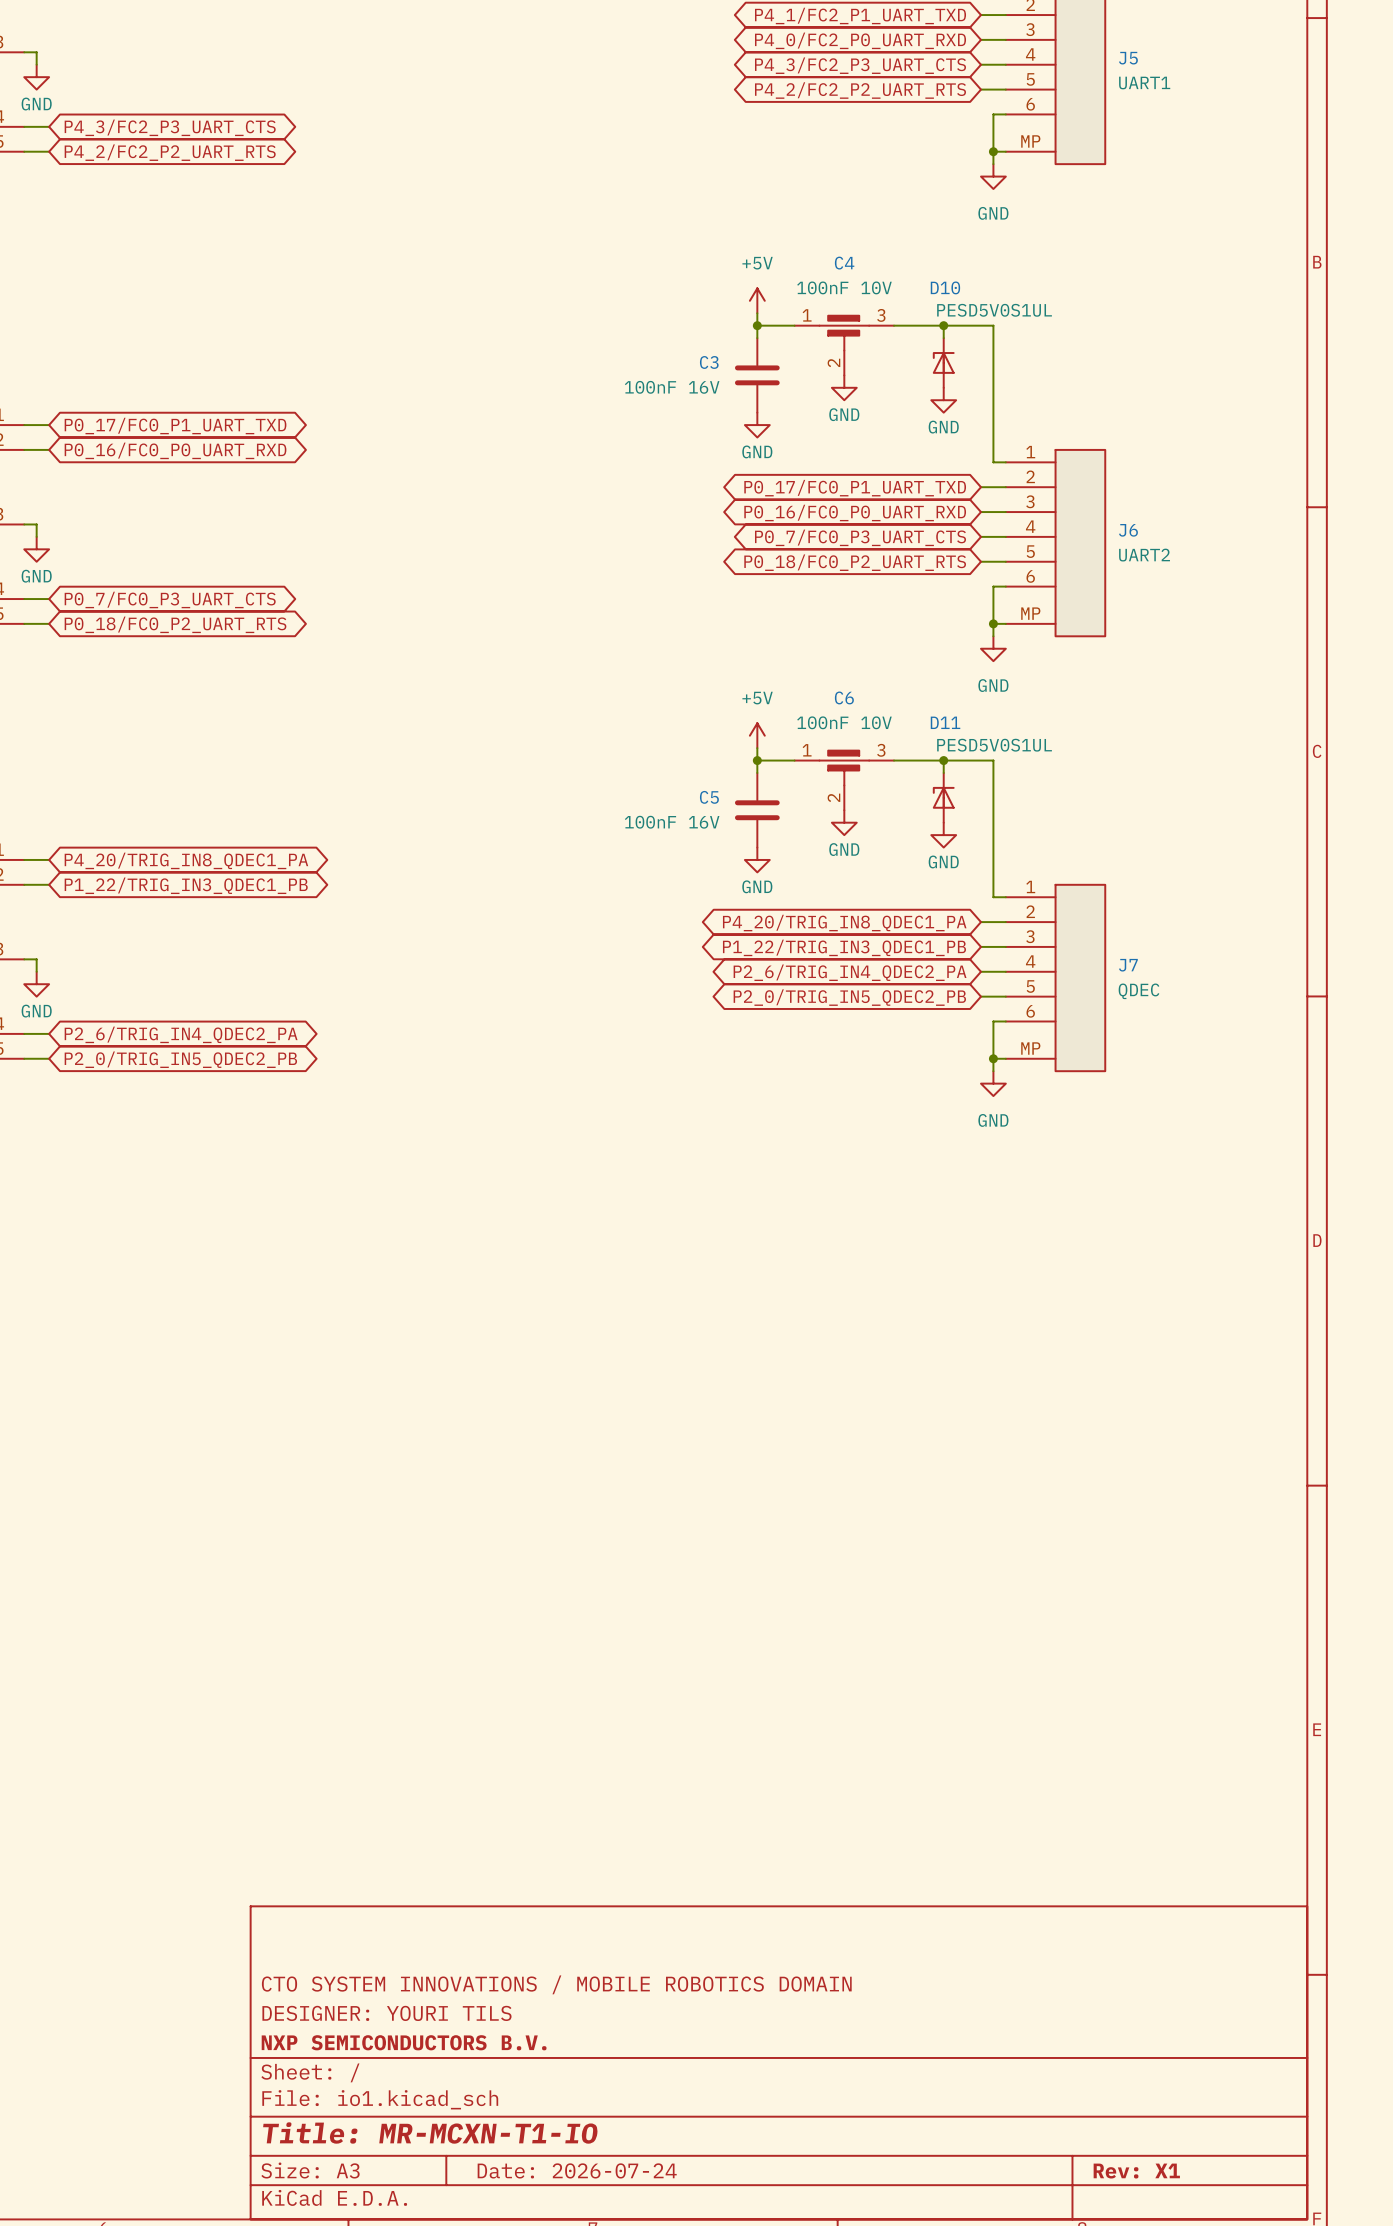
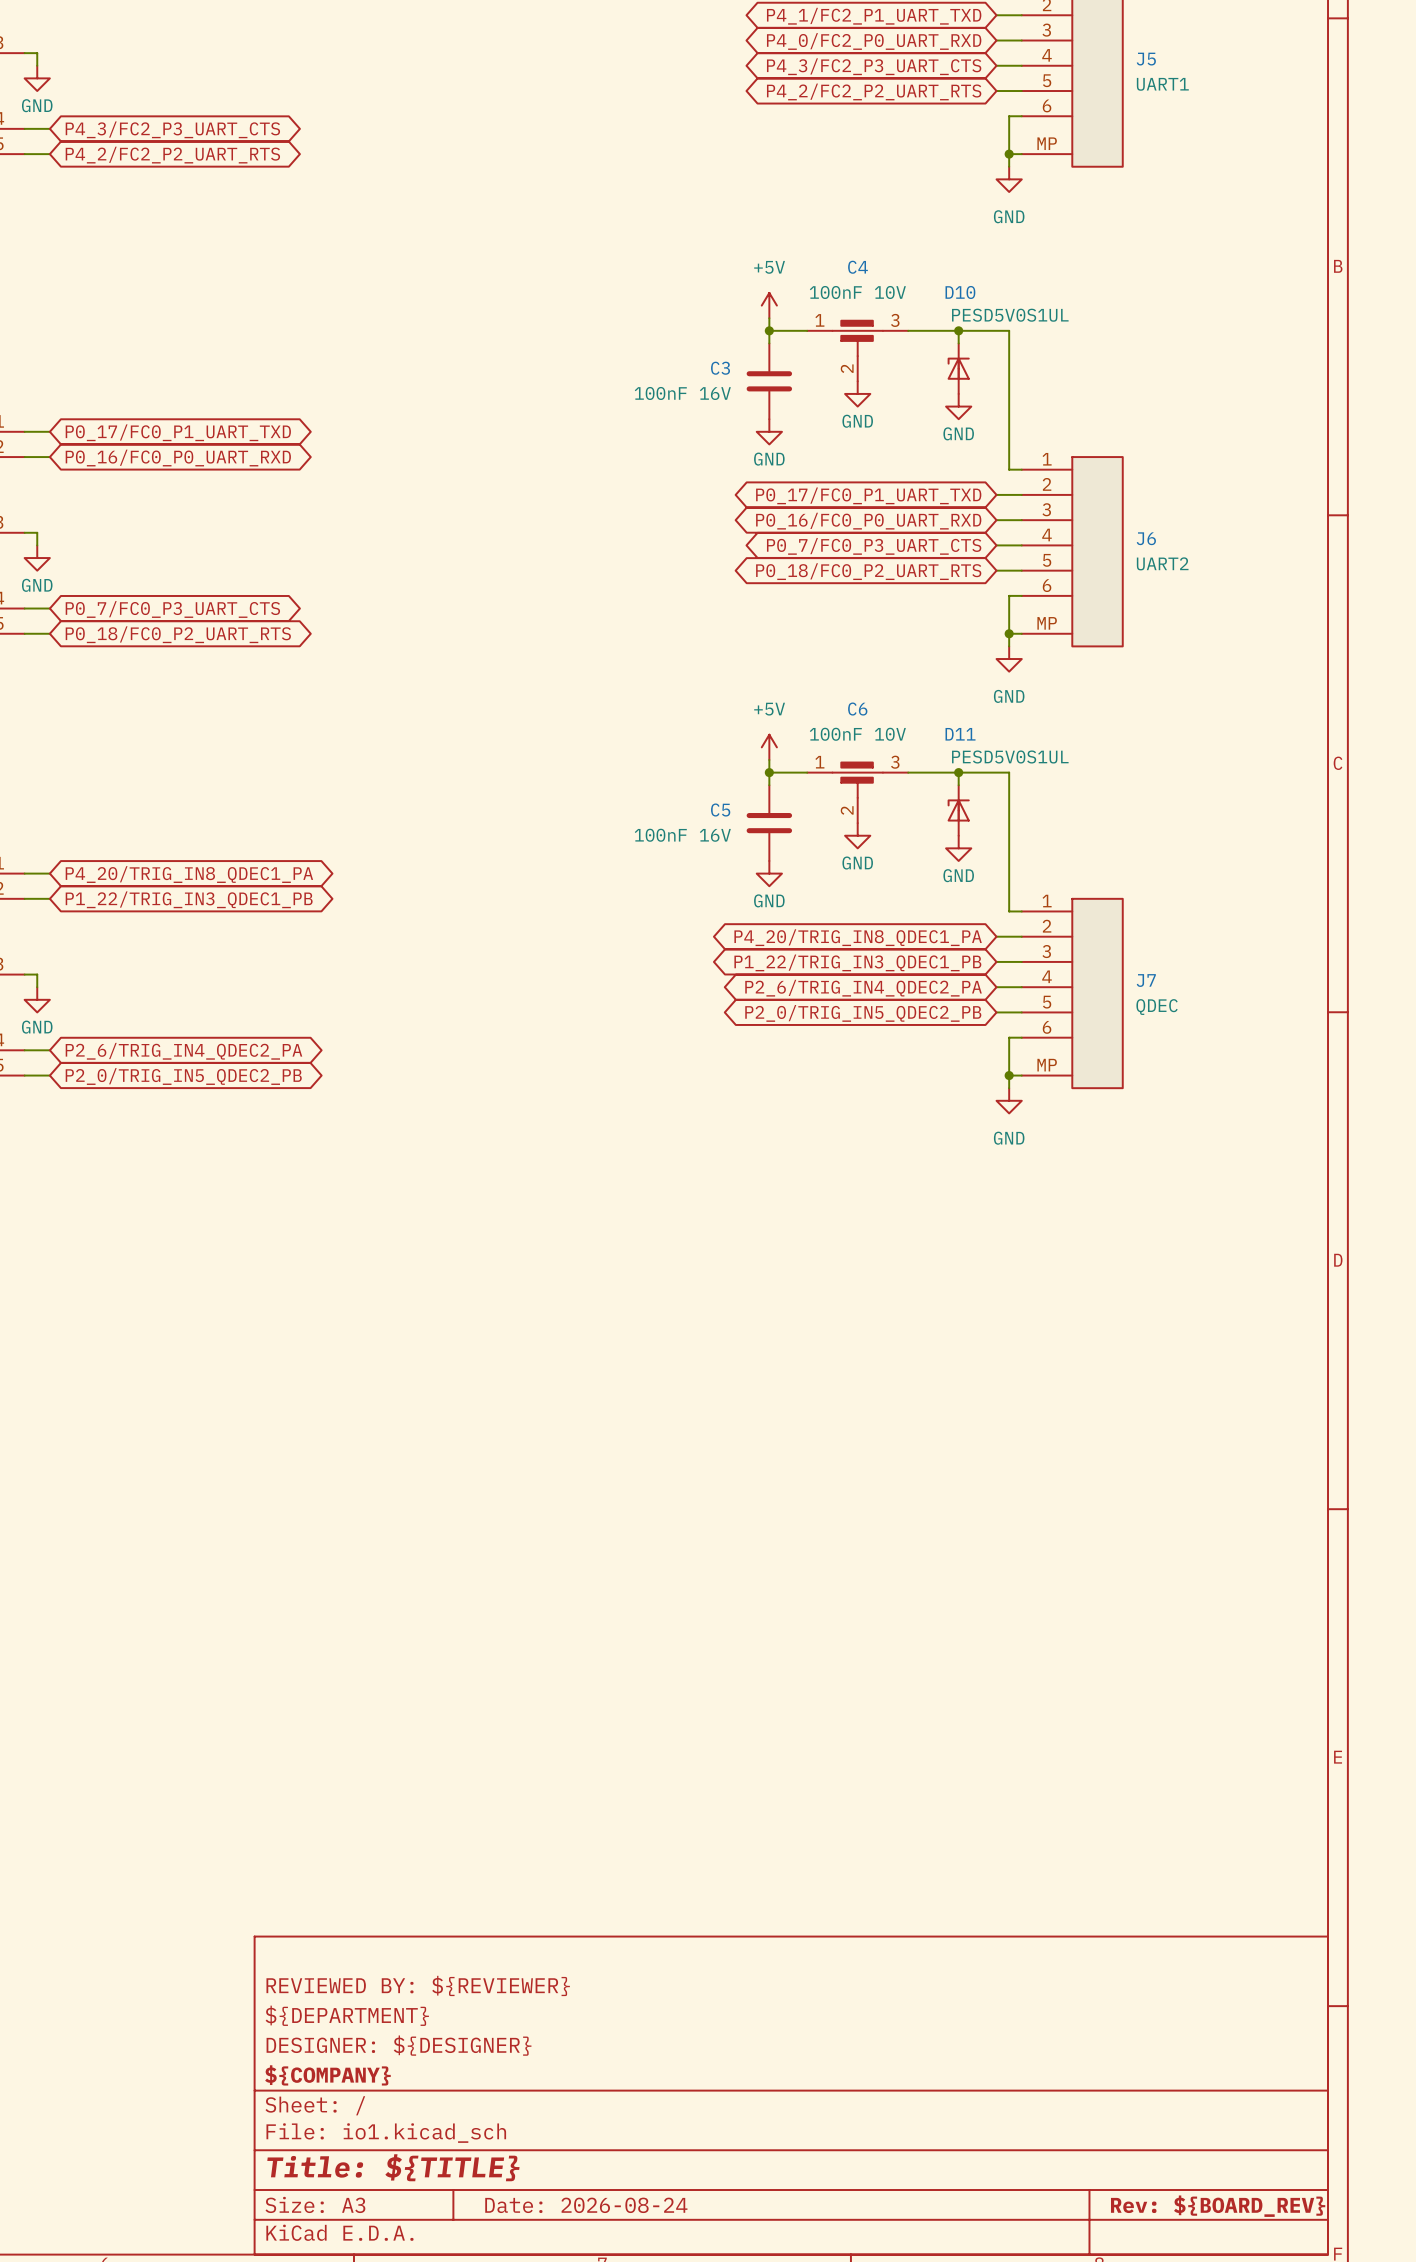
title block: none -> REVIEWED BY: ${REVIEWER} (418, 1985)
title block: CTO SYSTEM INNOVATIONS / MOBILE ROBOTICS DOMAIN (556, 1984) -> ${DEPARTMENT} (347, 2015)
title block: DESIGNER: YOURI TILS (386, 2013) -> DESIGNER: ${DESIGNER} (399, 2045)
title block: NXP SEMICONDUCTORS B.V. (404, 2042) -> ${COMPANY} (327, 2075)
title block: Title: MR-MCXN-T1-IO (430, 2132) -> Title: ${TITLE} (393, 2167)
title block: Date: 2026-07-24 (577, 2170) -> Date: 2026-08-24 (586, 2205)
title block: Rev: X1 (1136, 2171) -> Rev: ${BOARD_REV} (1218, 2206)

